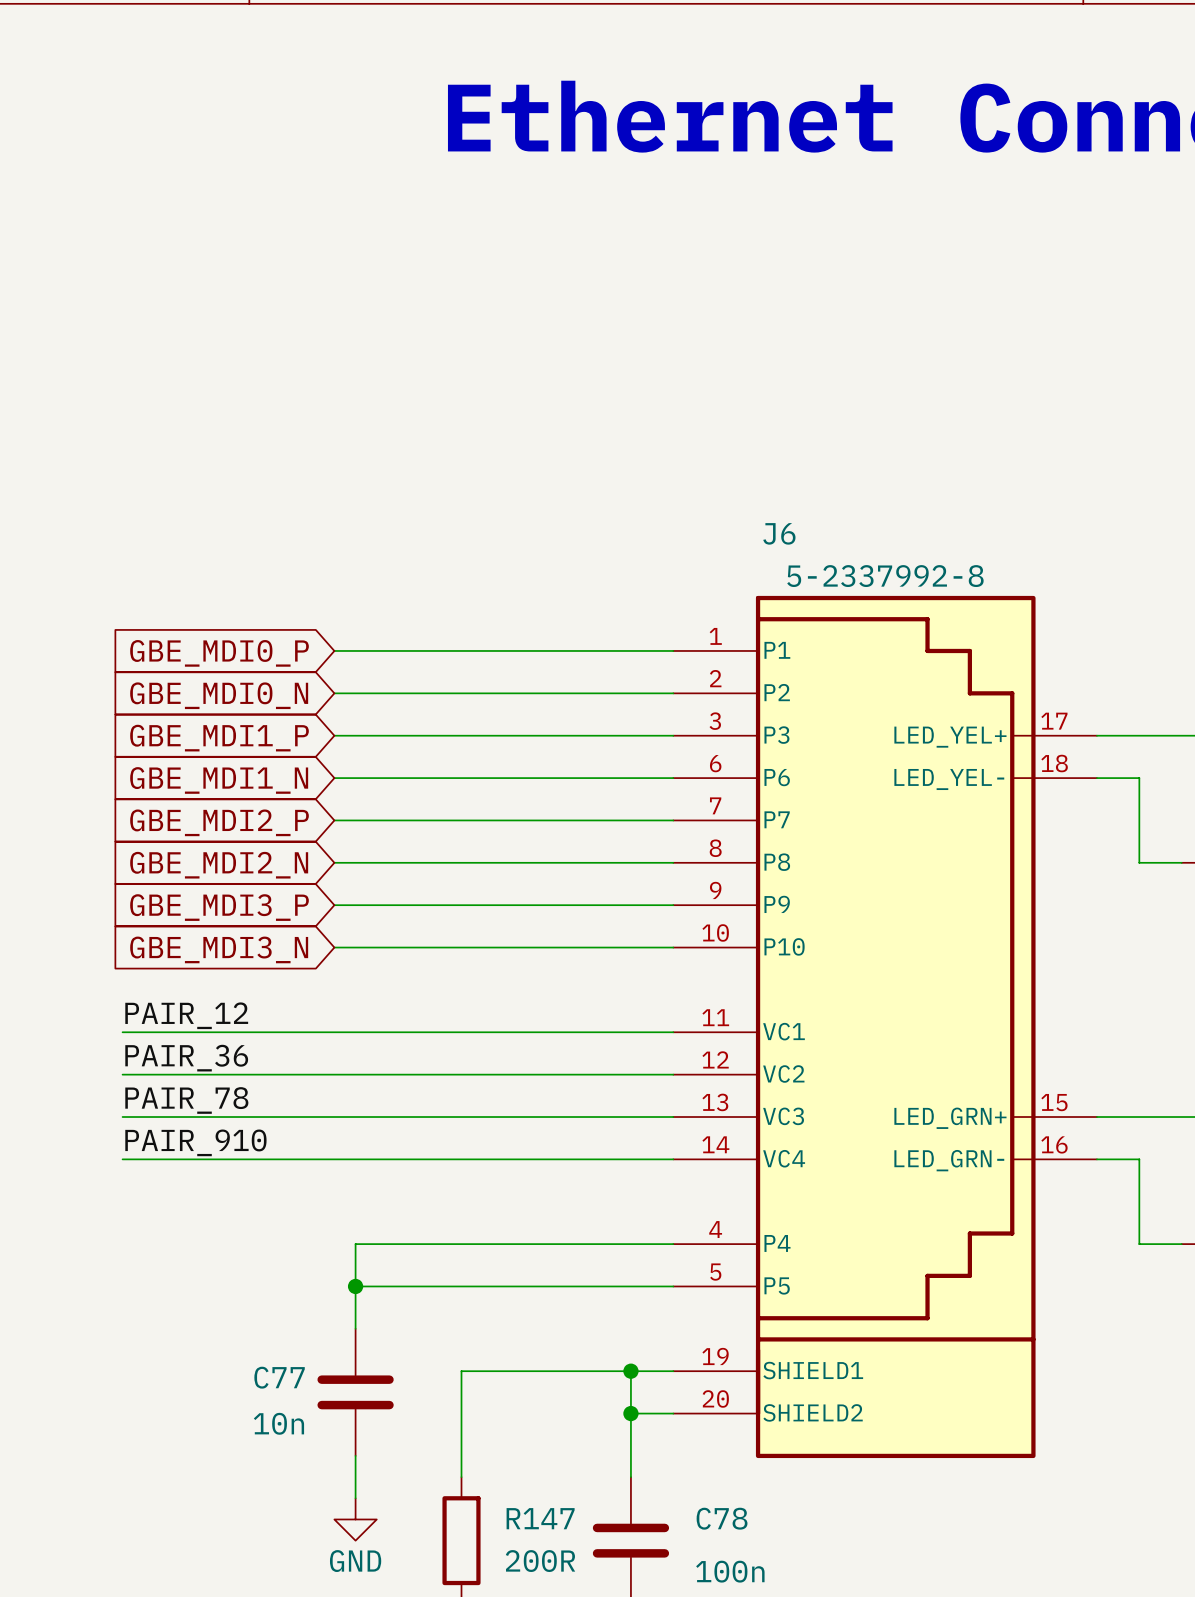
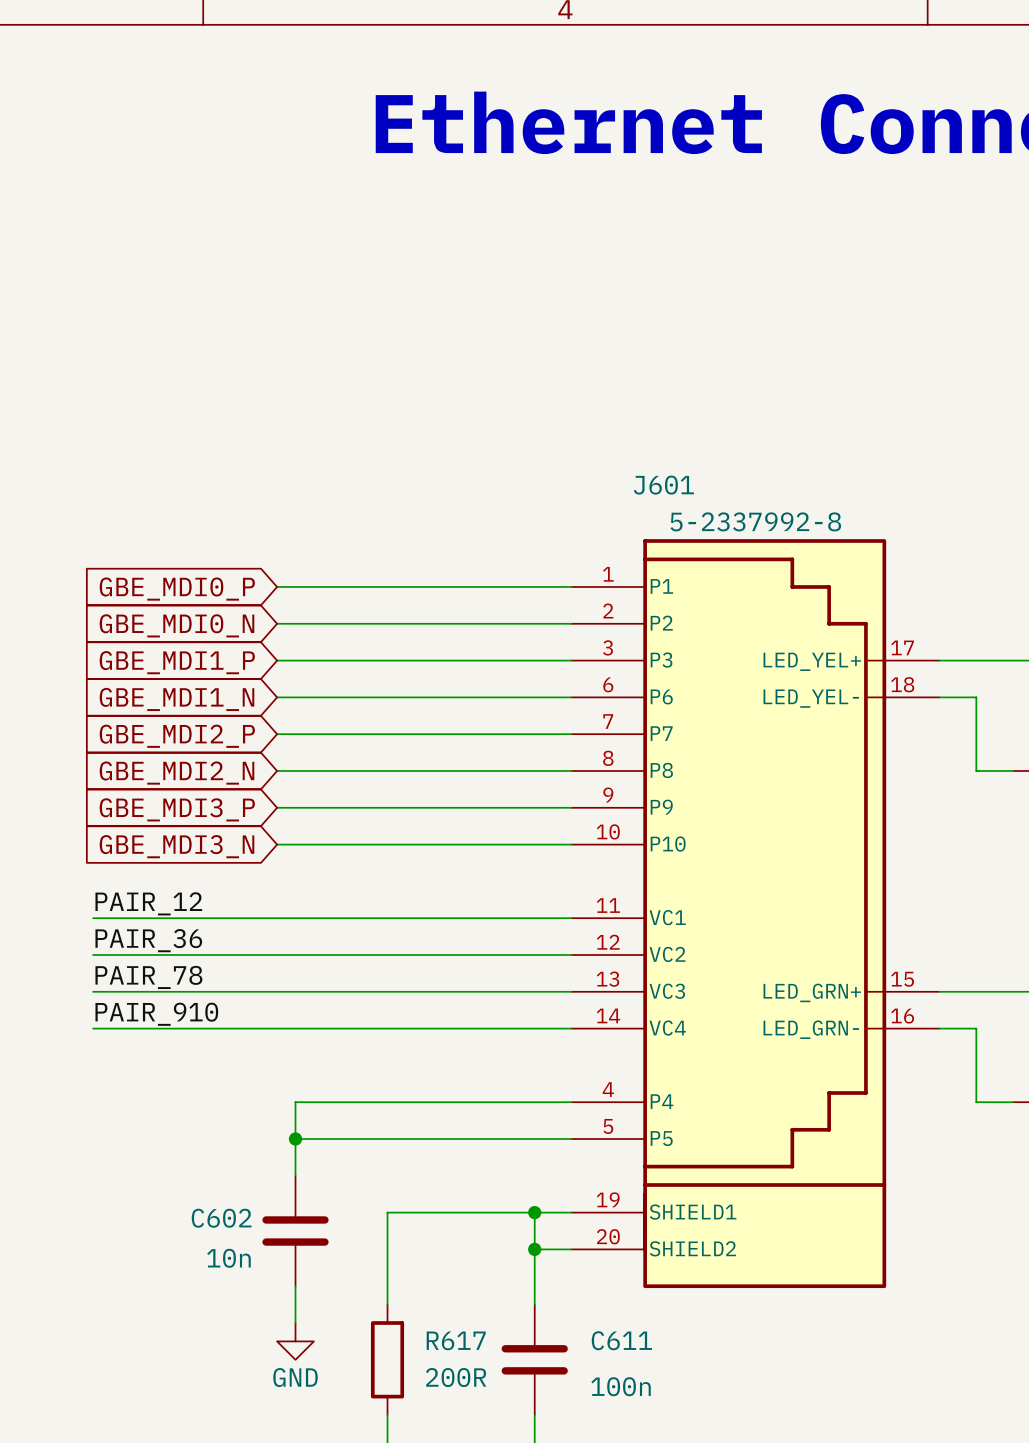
J6 name: J6 (779, 533) -> J601 (663, 485)
C77 name: C77 (279, 1377) -> C602 (221, 1218)
R147 name: R147 (540, 1518) -> R617 (456, 1340)
C78 name: C78 (722, 1518) -> C611 (621, 1340)

